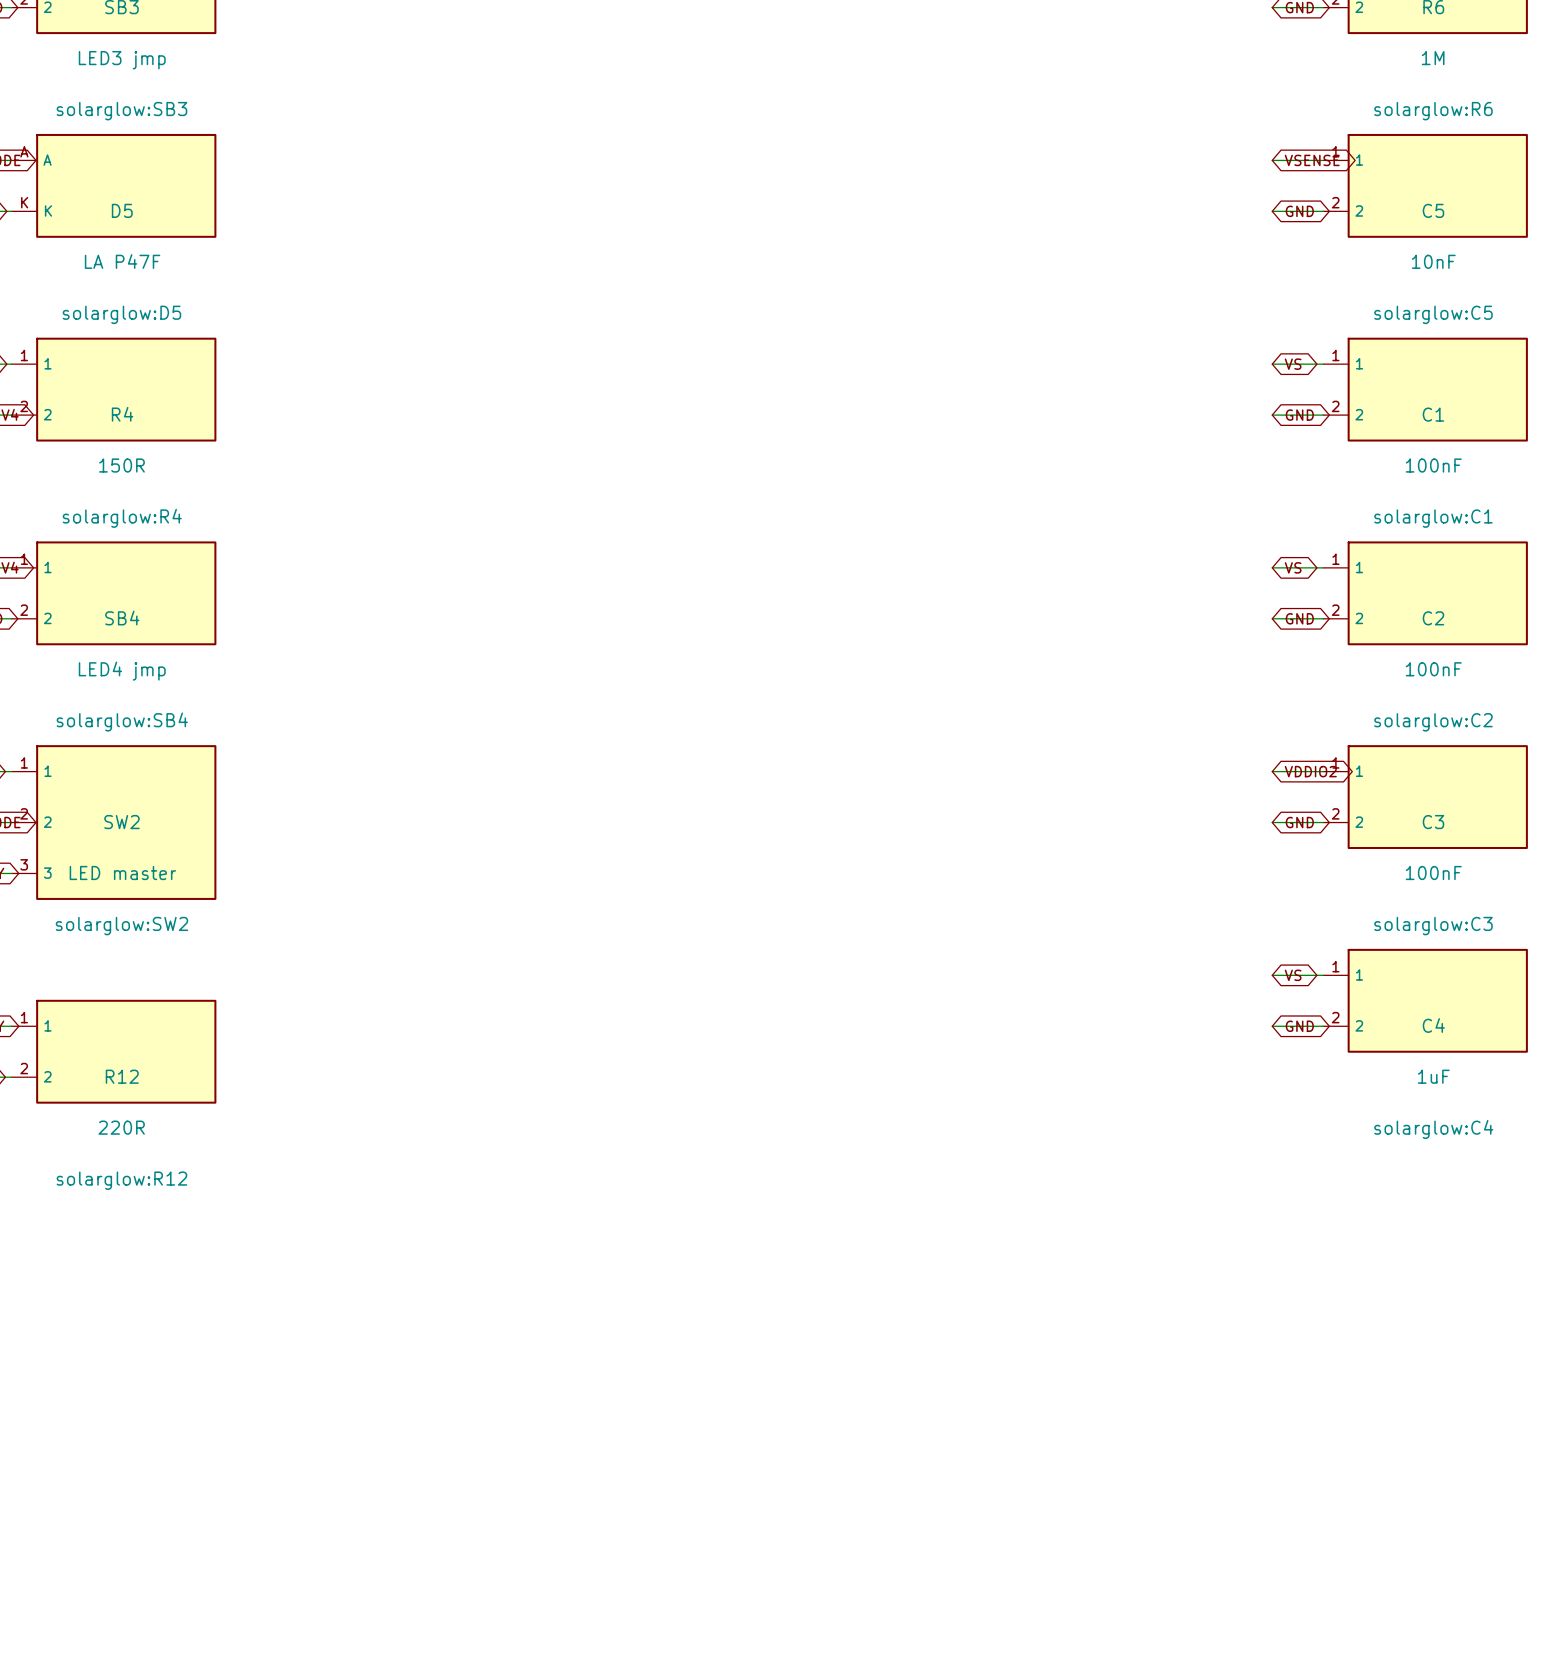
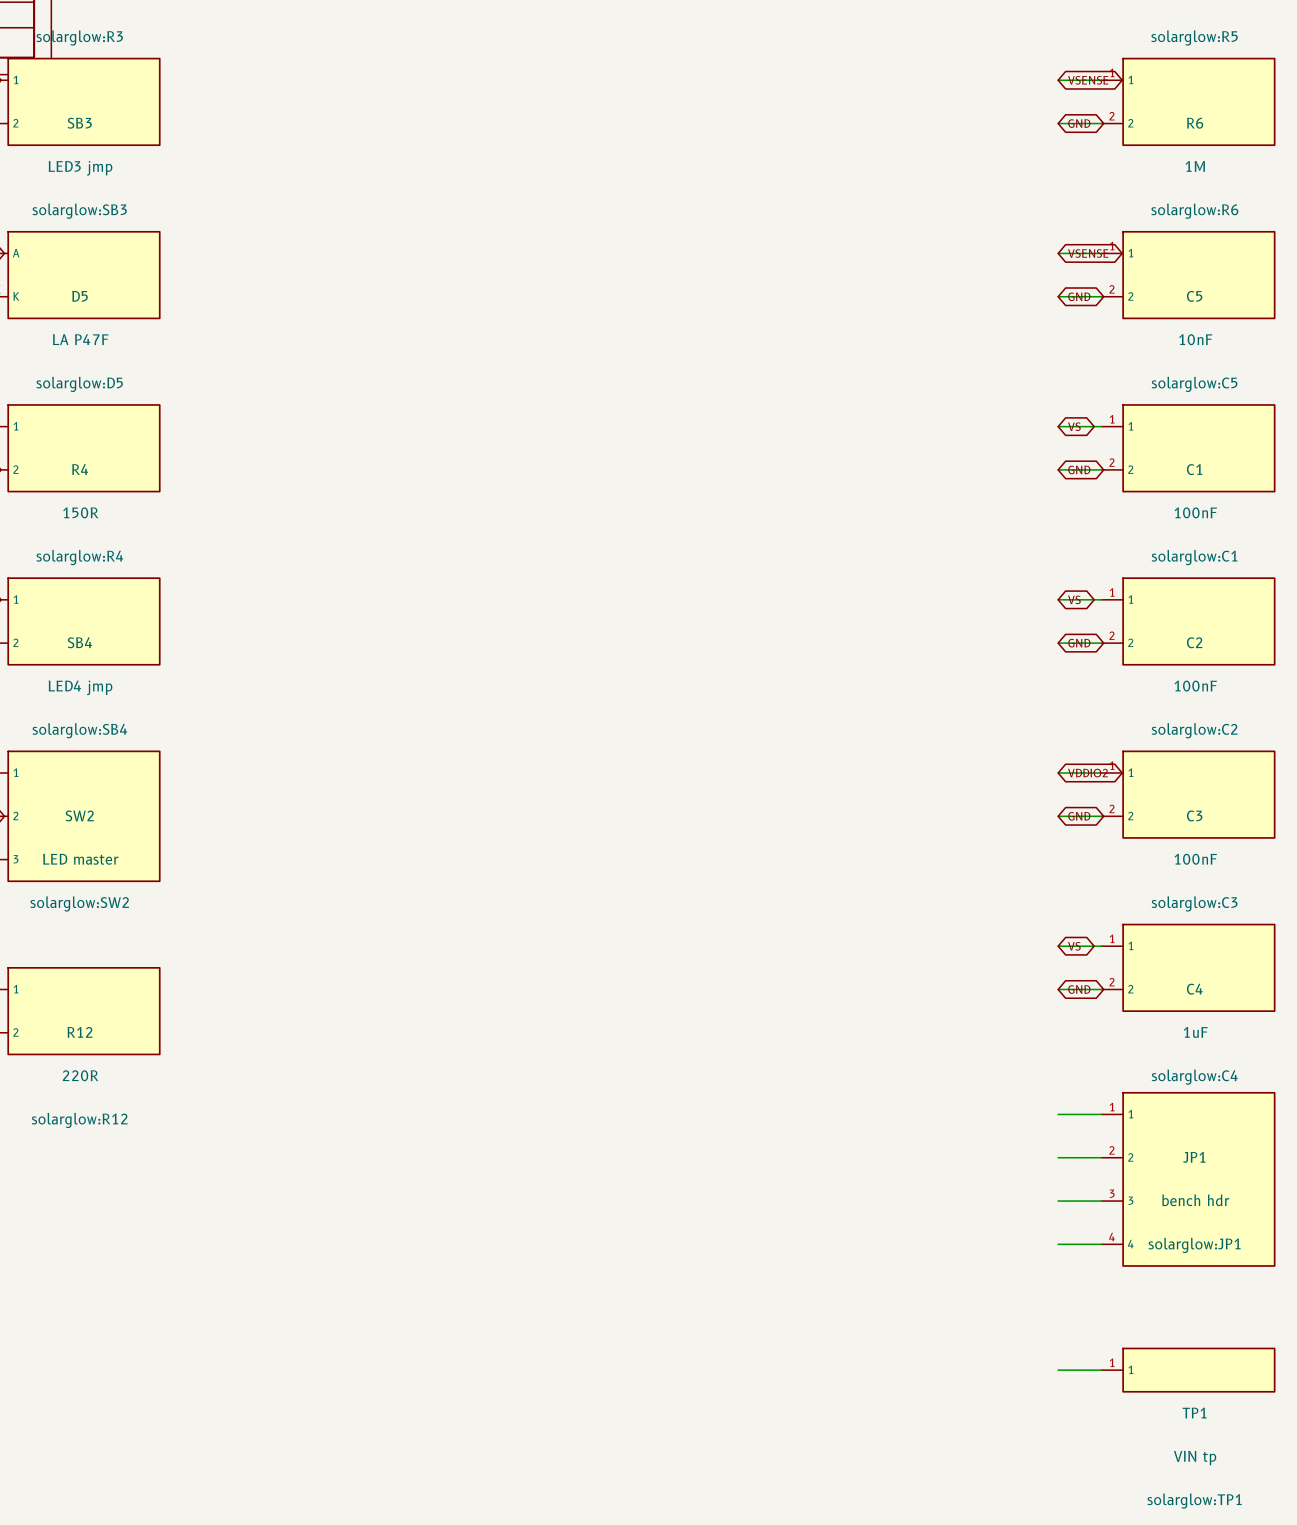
wire: none -> (1058, 1114) (1101, 1114)
wire: none -> (1058, 1157) (1101, 1157)
JP1: none -> bench hdr (1188, 1179)
wire: none -> (1058, 1201) (1101, 1201)
wire: none -> (1058, 1244) (1101, 1244)
wire: none -> (1058, 1370) (1101, 1370)
TP1: none -> VIN tp (1188, 1370)

